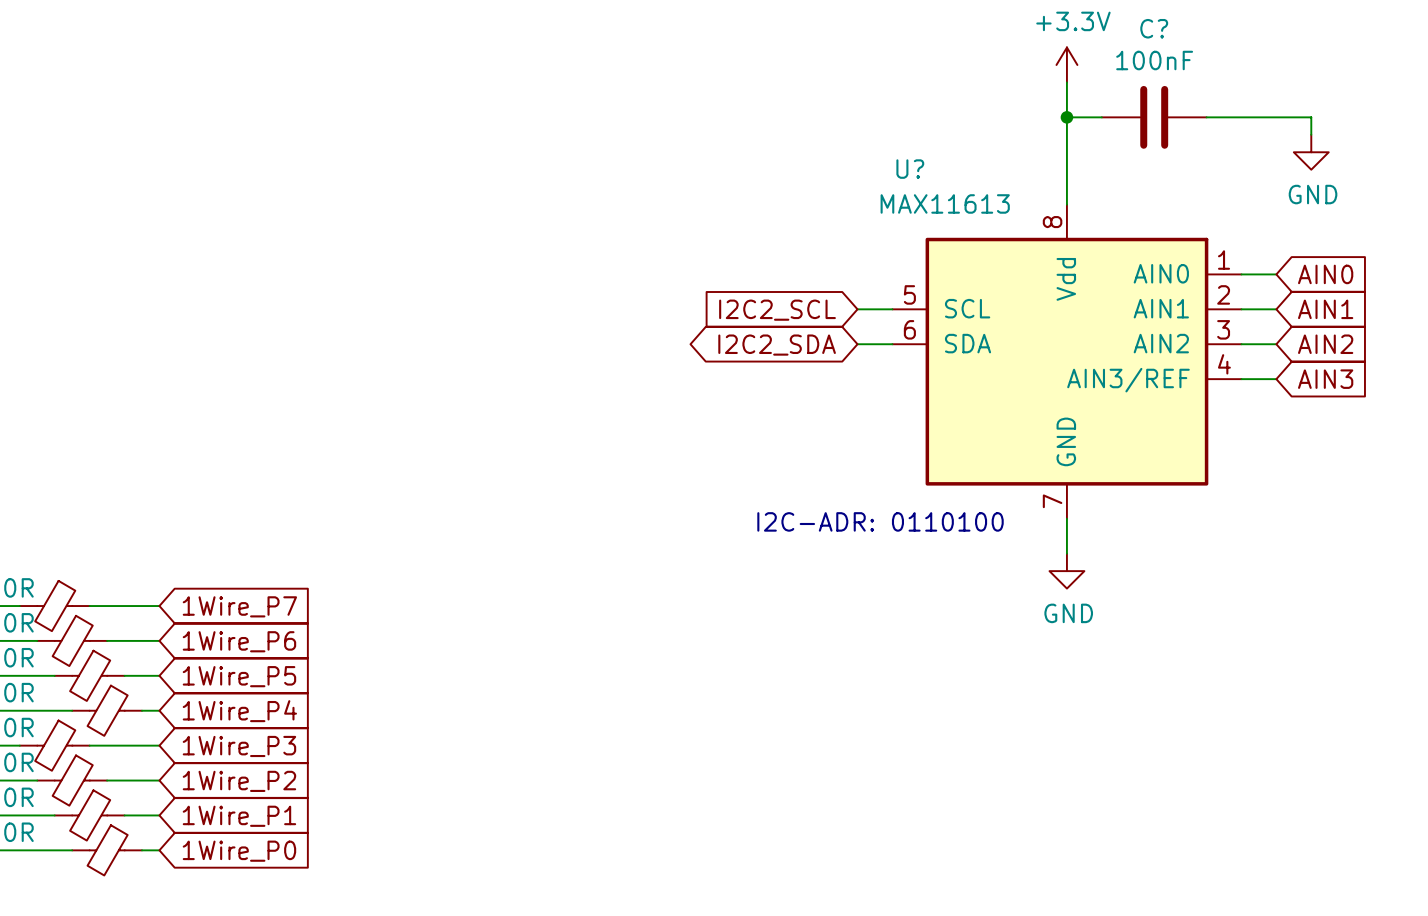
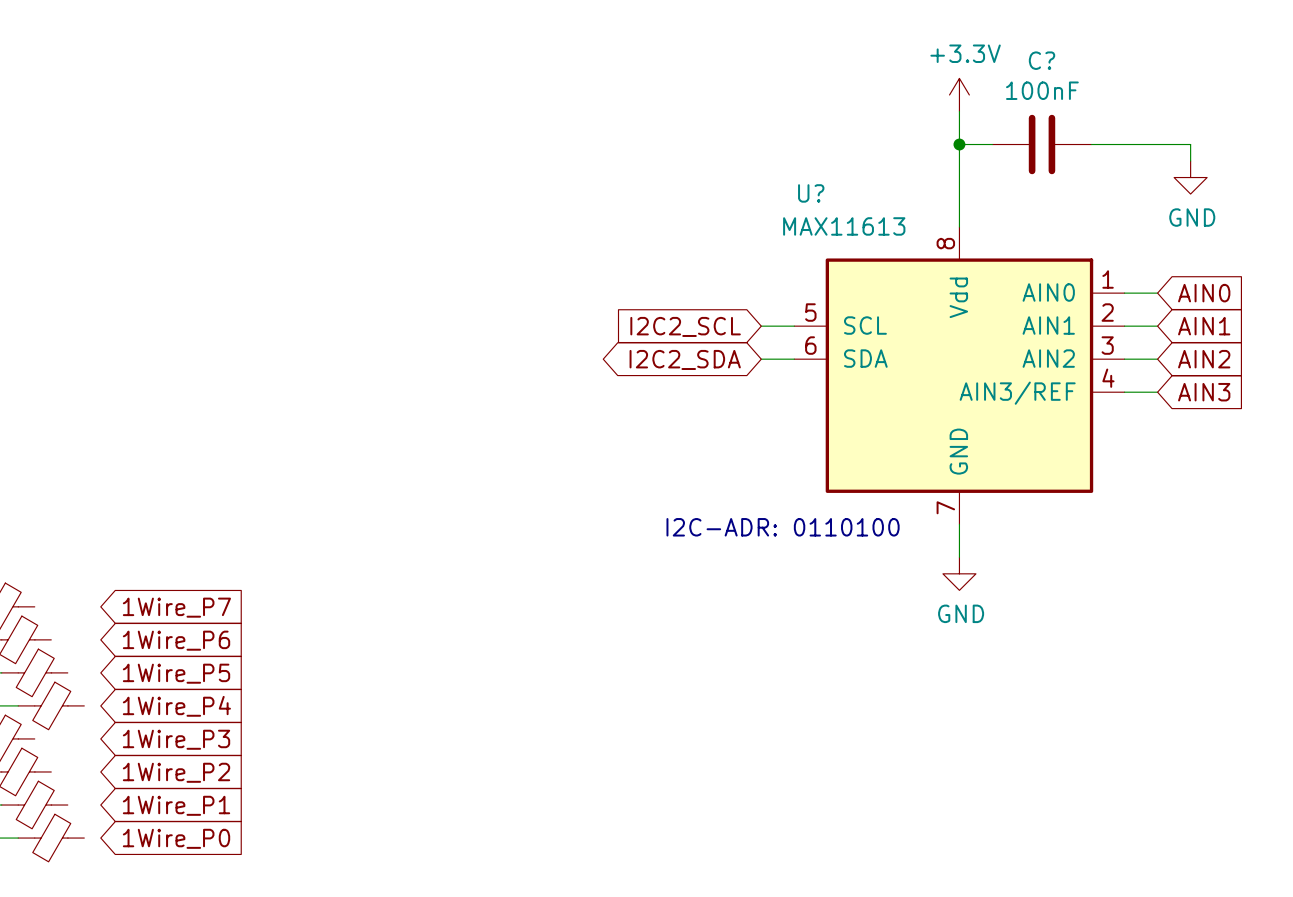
wire: (89, 606) (159, 606) -> none
wire: (107, 640) (159, 640) -> none
wire: (124, 675) (159, 675) -> none
wire: (141, 710) (159, 710) -> none
wire: (89, 745) (159, 745) -> none
wire: (107, 780) (159, 780) -> none
wire: (124, 815) (159, 815) -> none
wire: (141, 850) (159, 850) -> none

